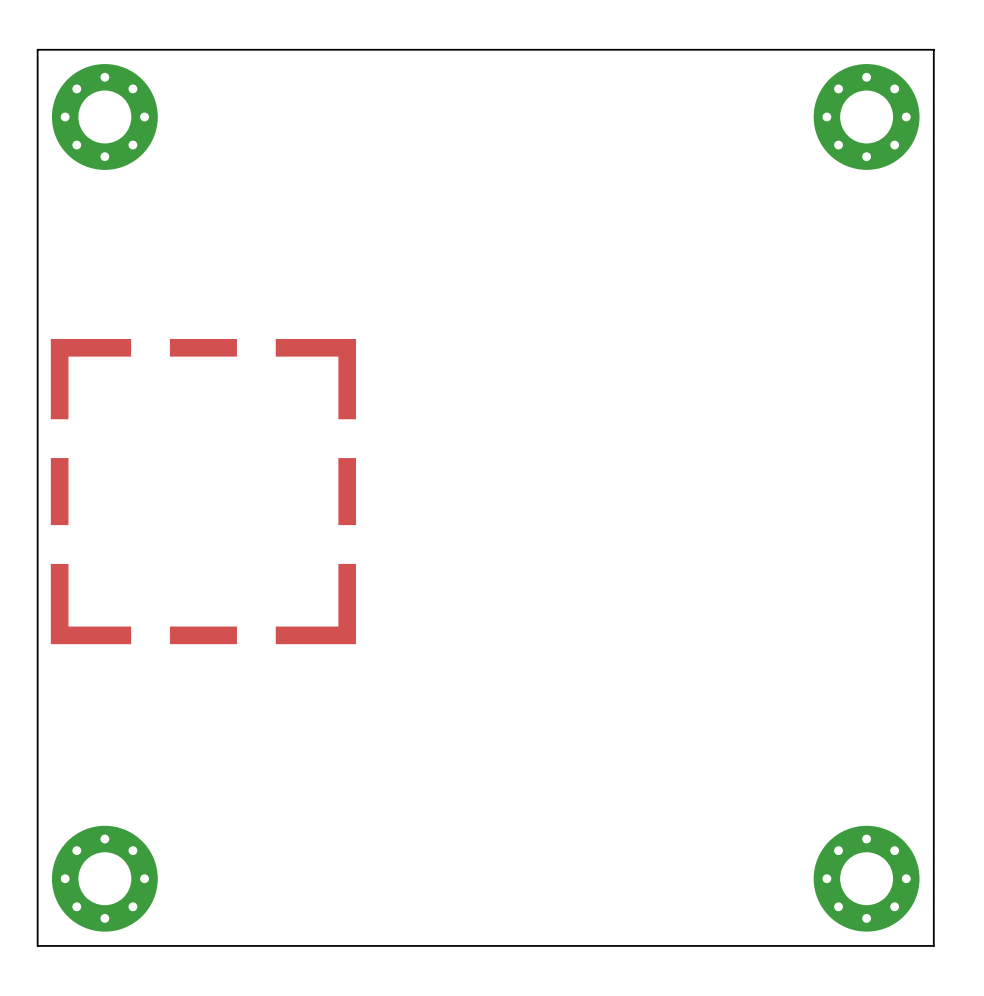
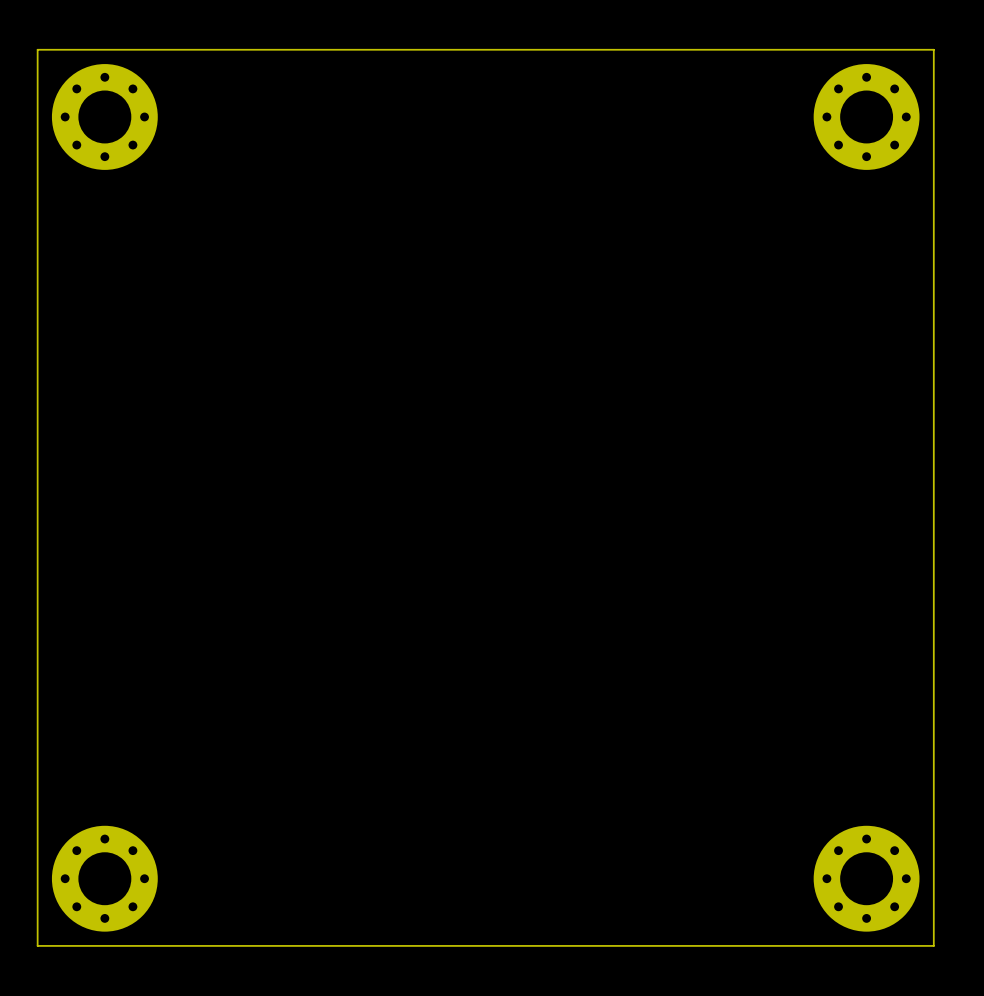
part: (203, 491) -> none

